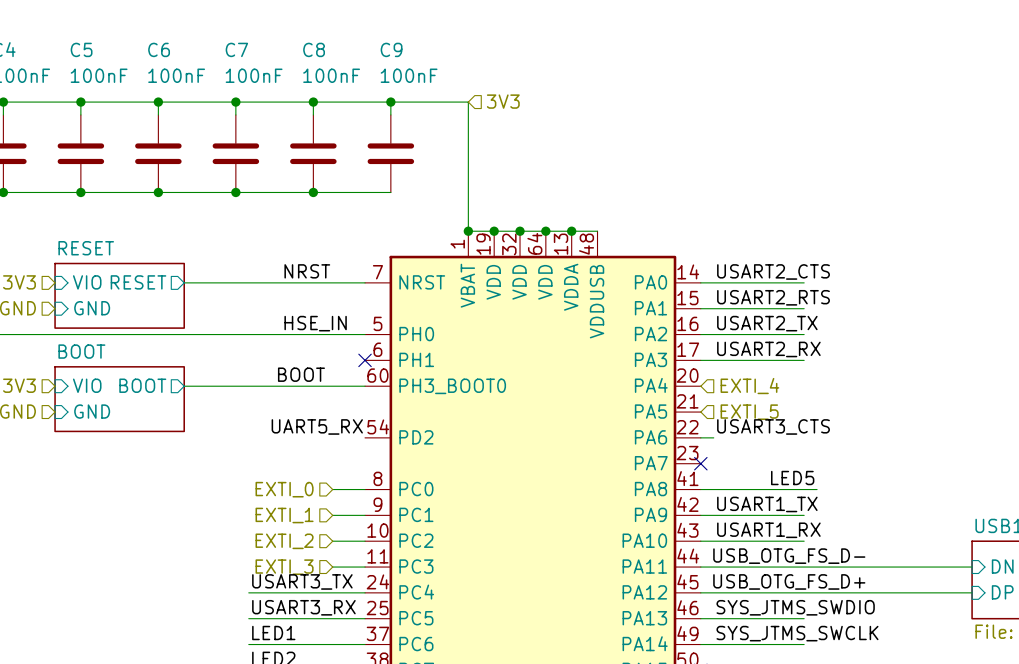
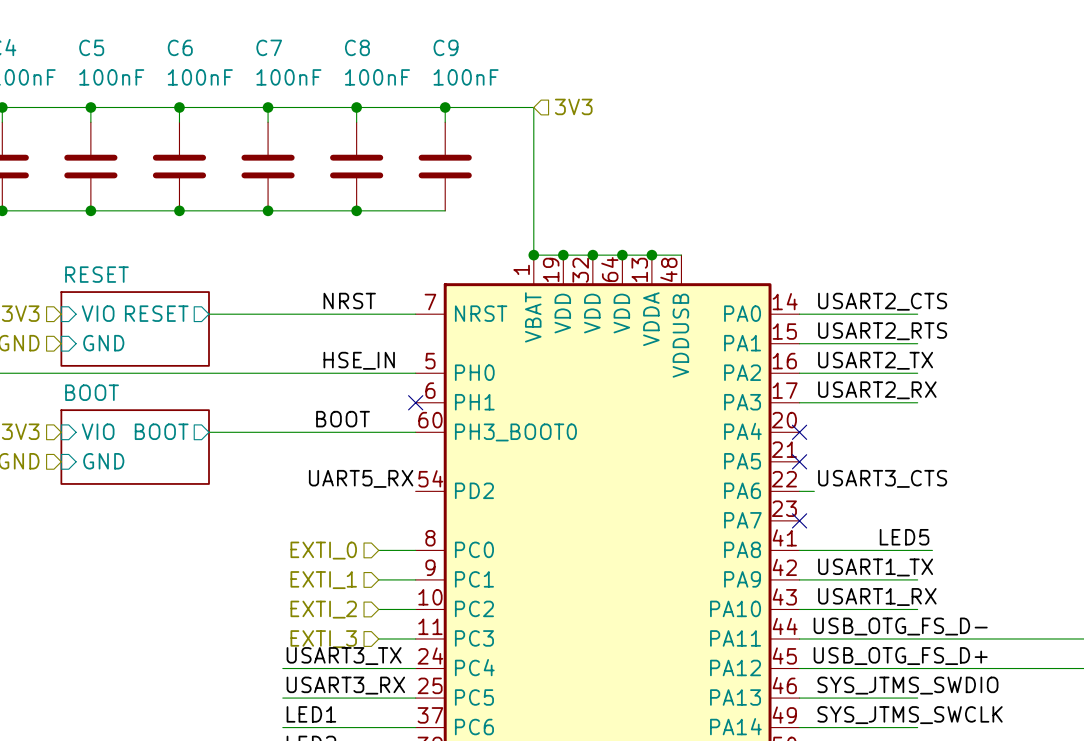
no-connect mark: none -> (799, 432)
hierarchical label: EXTI_4 (749, 386) -> none
no-connect mark: none -> (799, 461)
hierarchical label: EXTI_5 (749, 412) -> none

